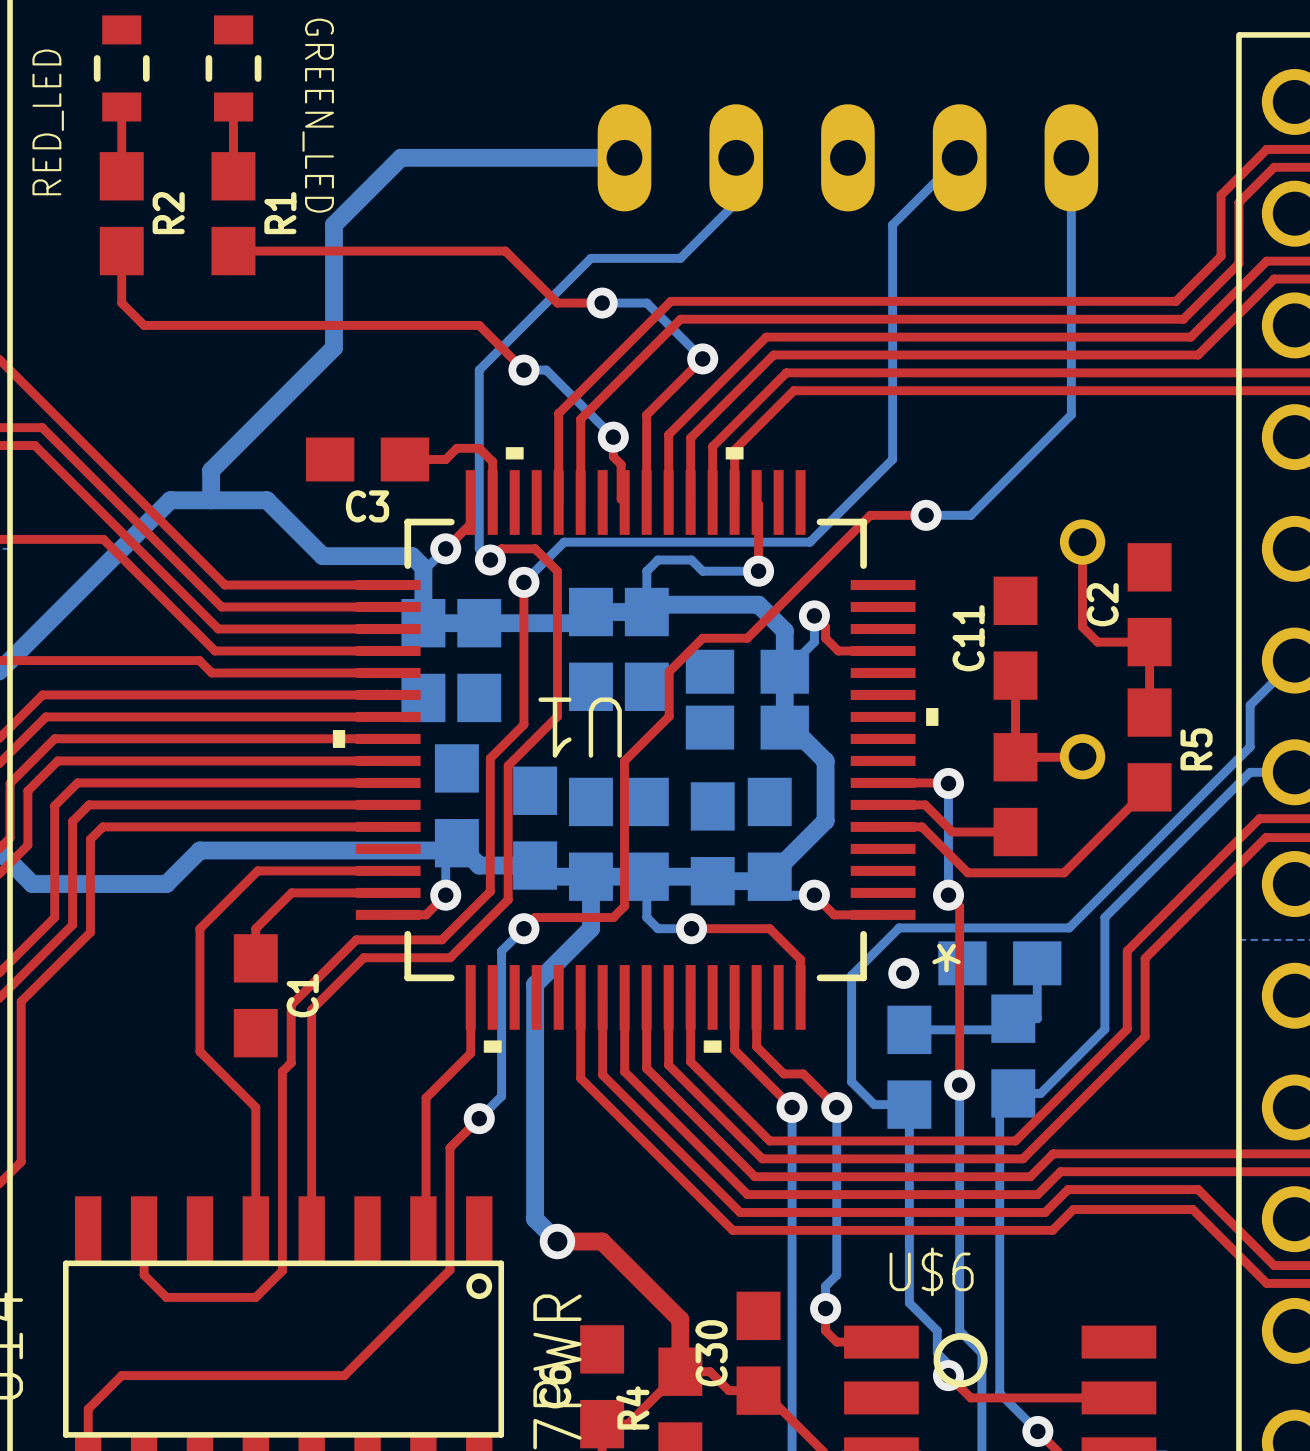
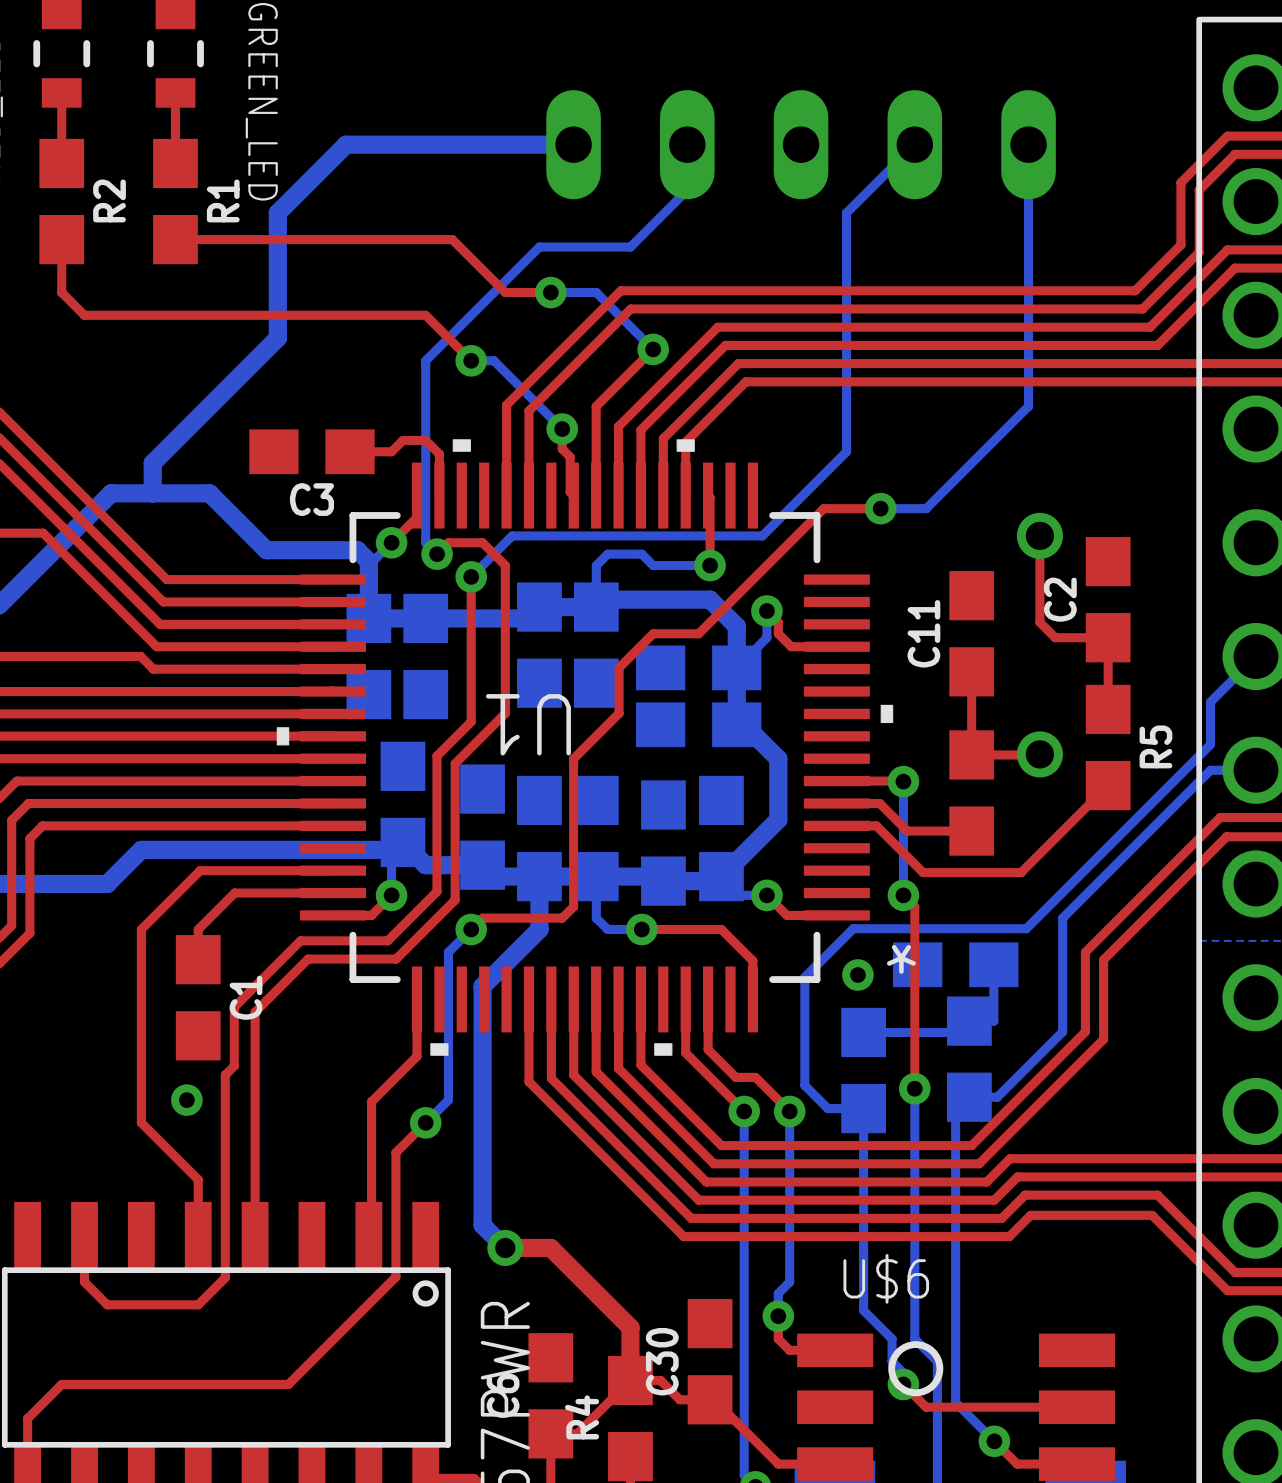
top track: (199, 1051) (255, 1107) (255, 1174) -> (141, 1054) (141, 1122) (198, 1179)
via: none -> (186, 1100)

